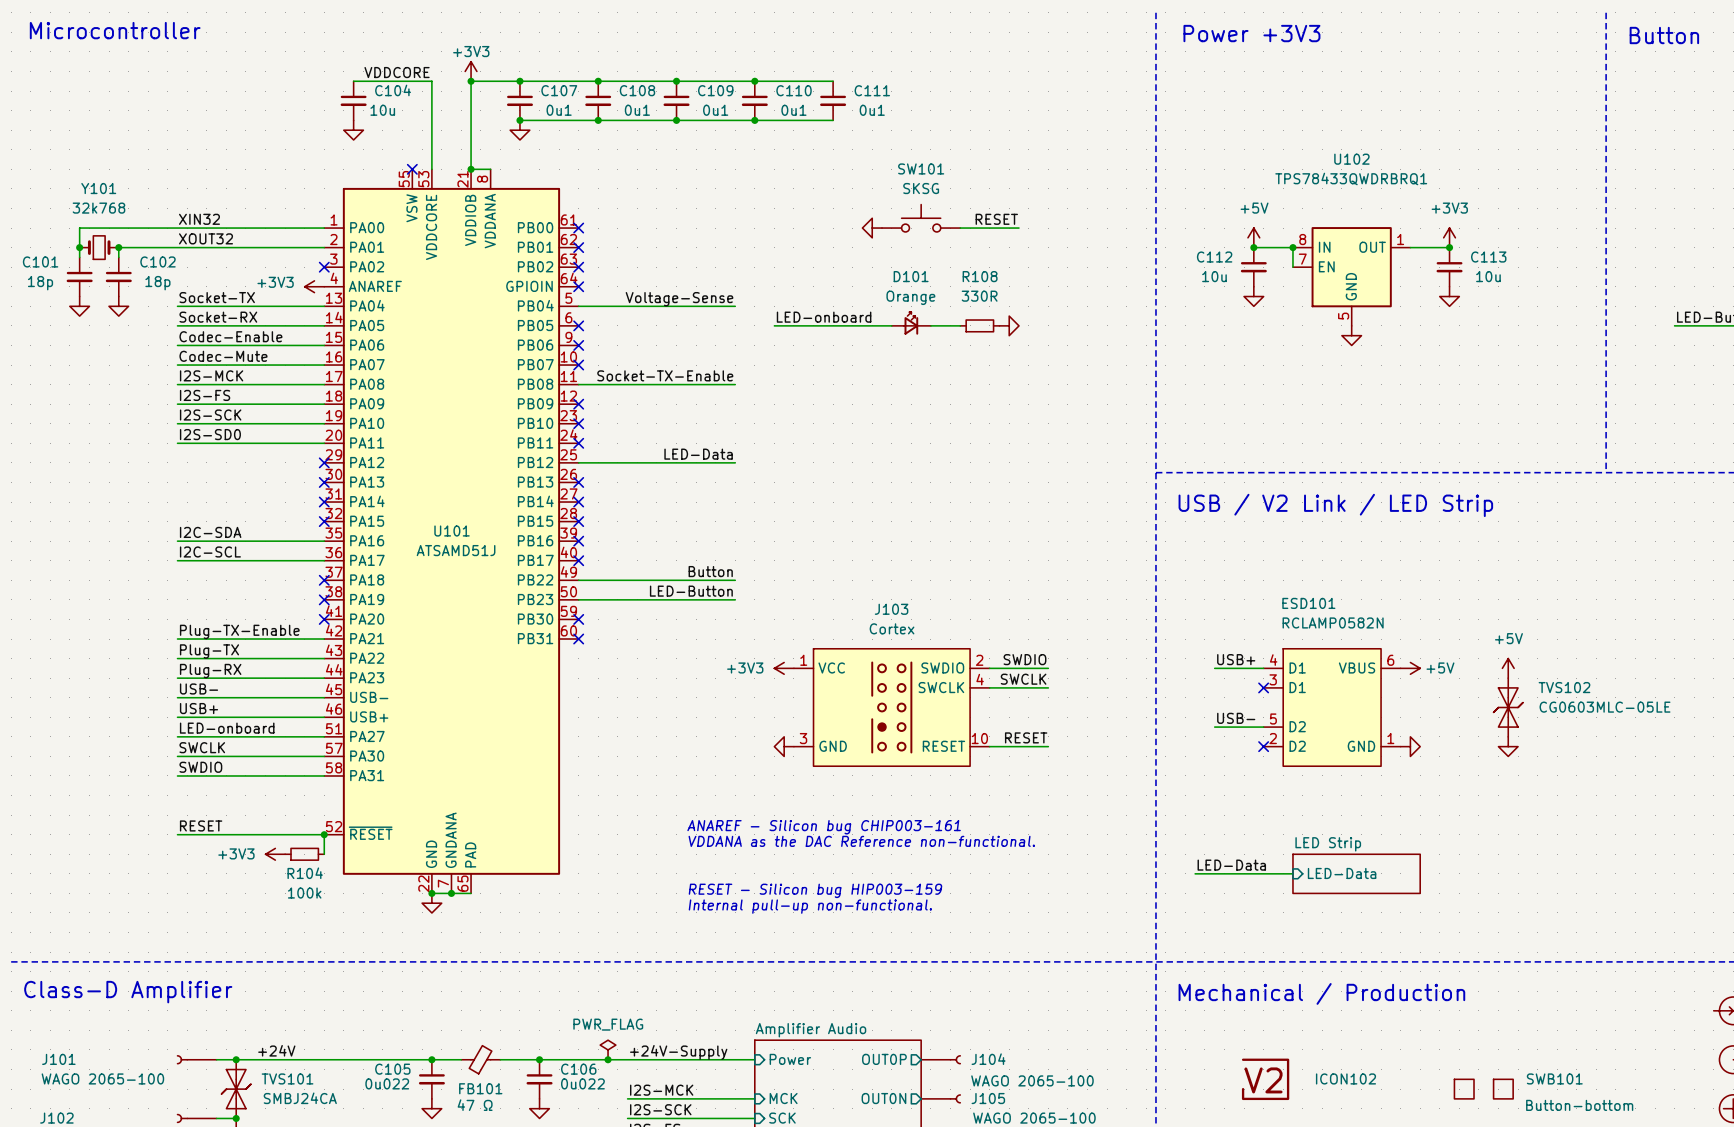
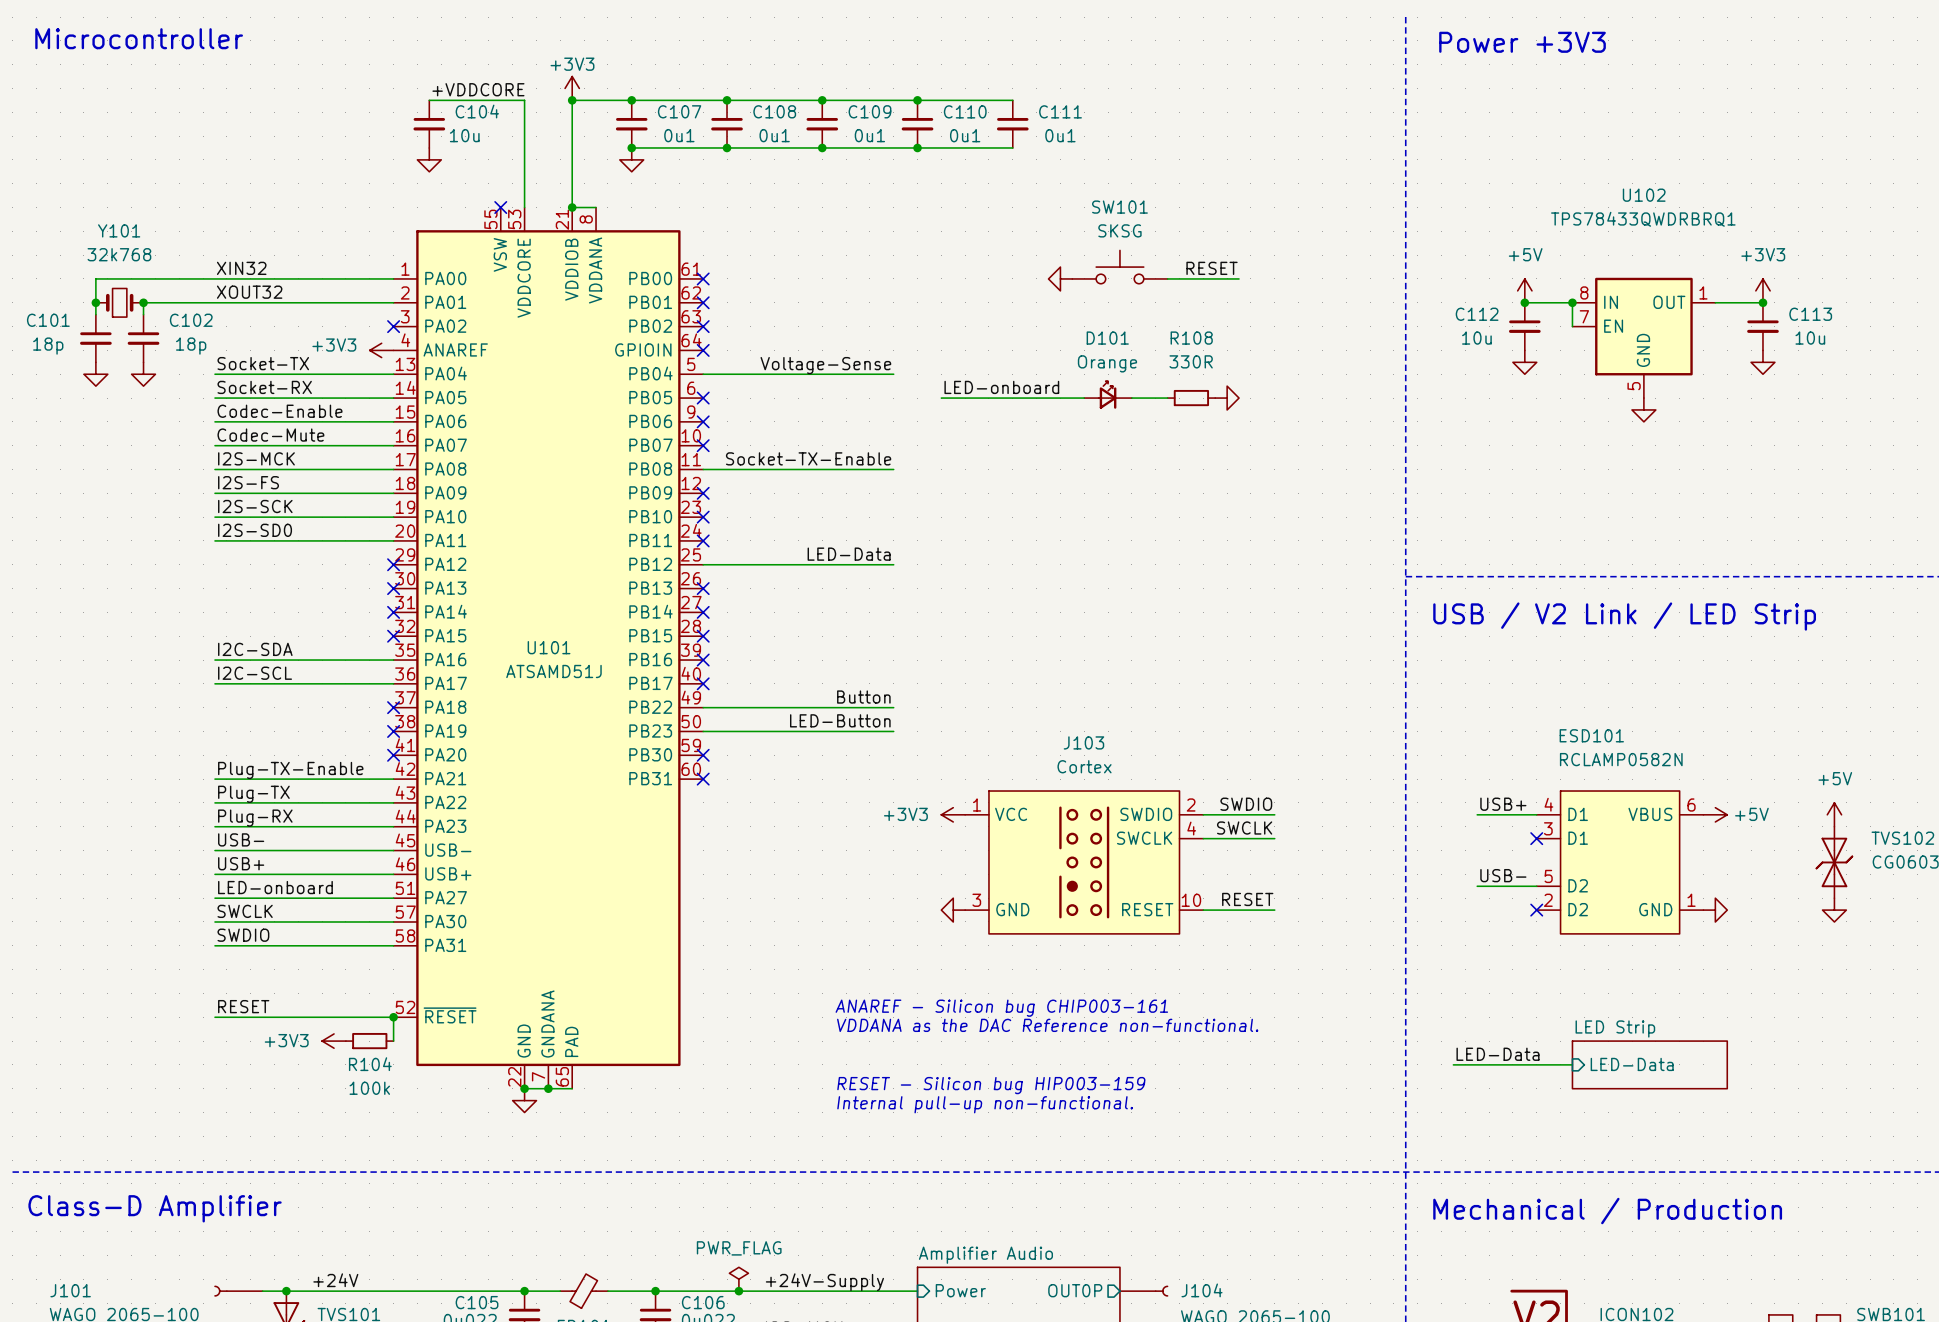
label: VDDCORE (397, 72) -> +VDDCORE (478, 89)

